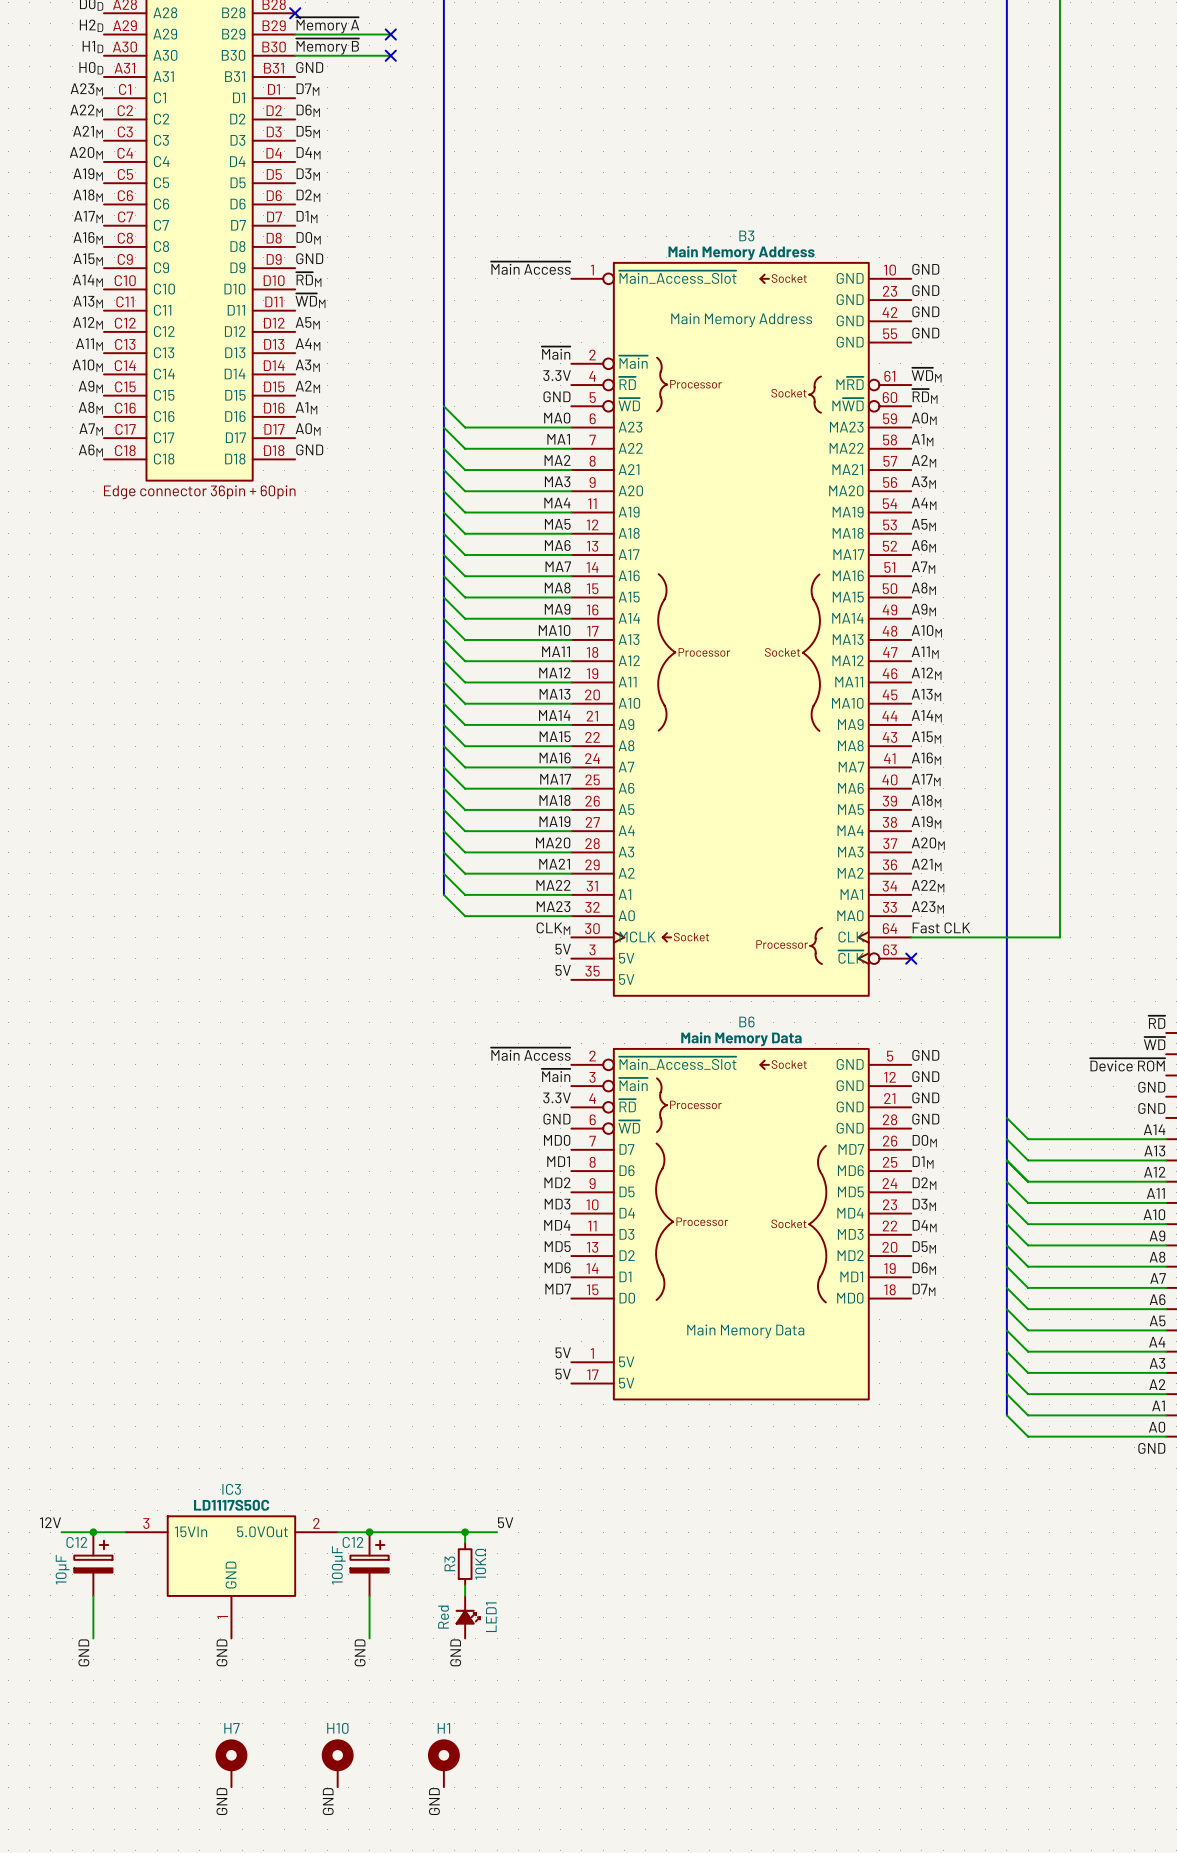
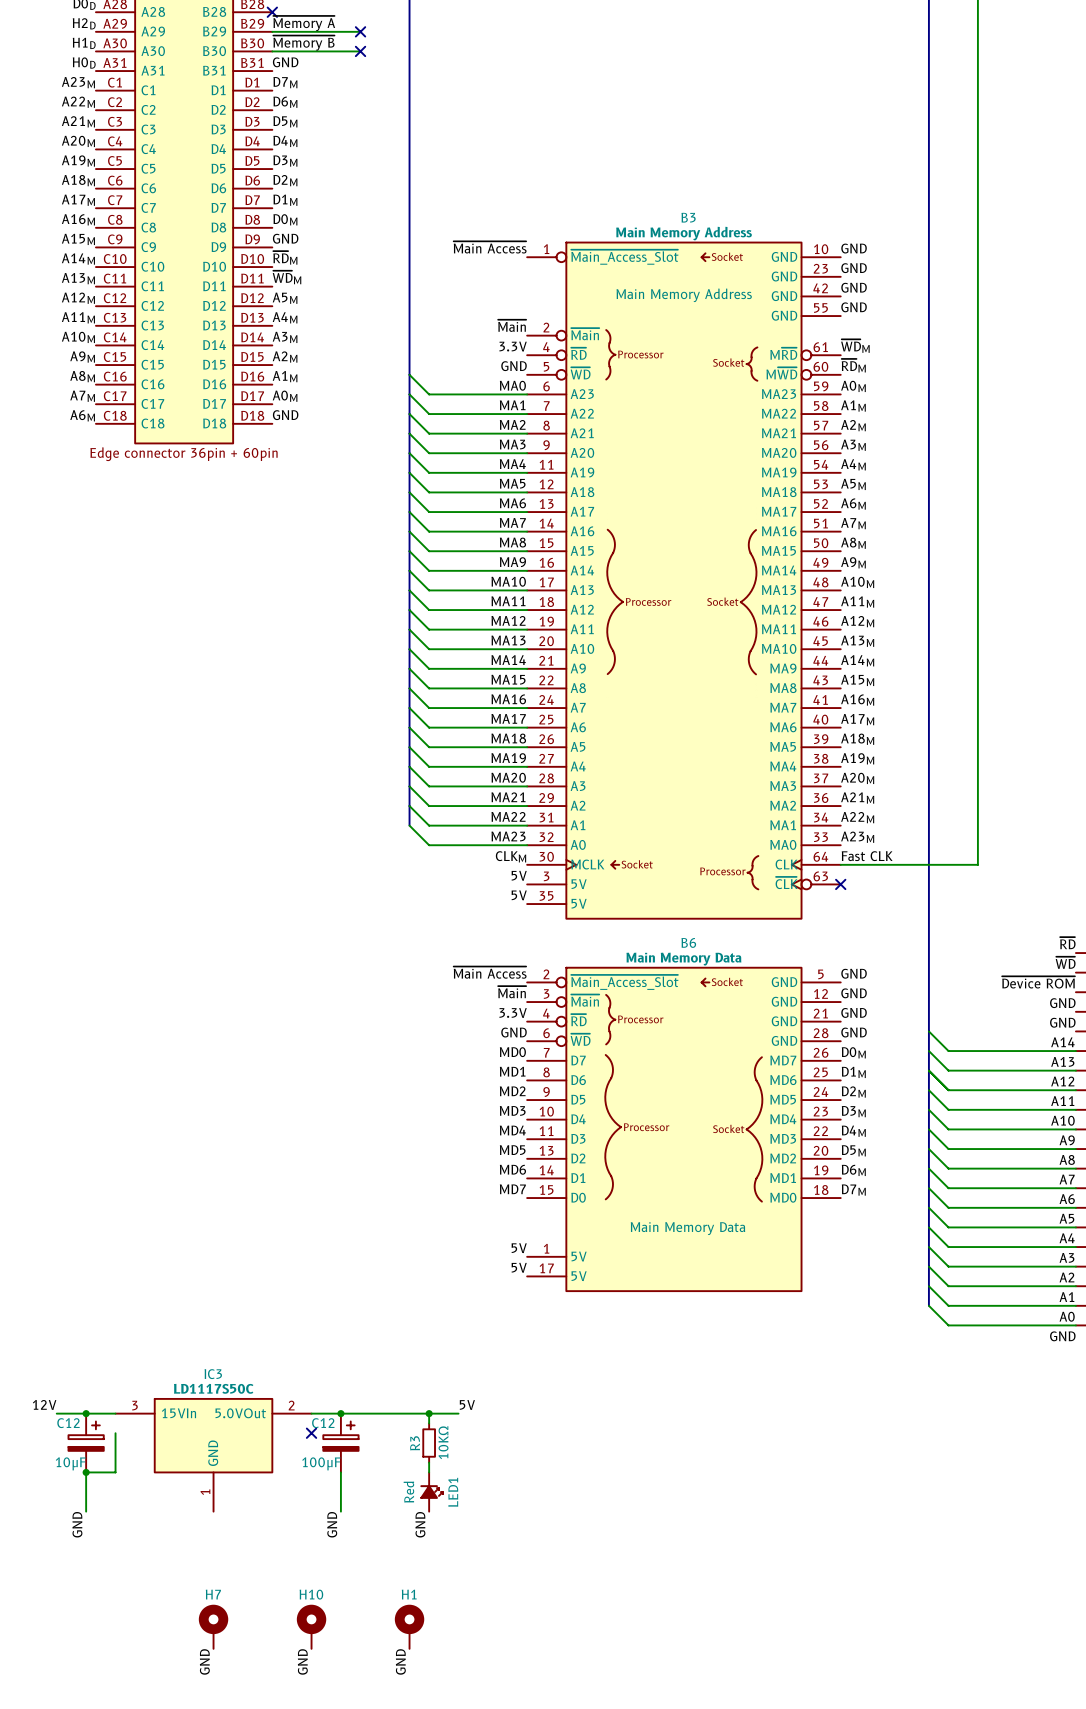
wire: none -> (115, 1433) (115, 1472) (86, 1472)
no-connect mark: none -> (311, 1433)
C12 value rotation: 0° (338, 1565) -> 90° clockwise (321, 1463)
C12 value rotation: 0° (62, 1569) -> 90° clockwise (70, 1463)
junction: none -> (86, 1472)
label: GND (221, 1652) -> none

